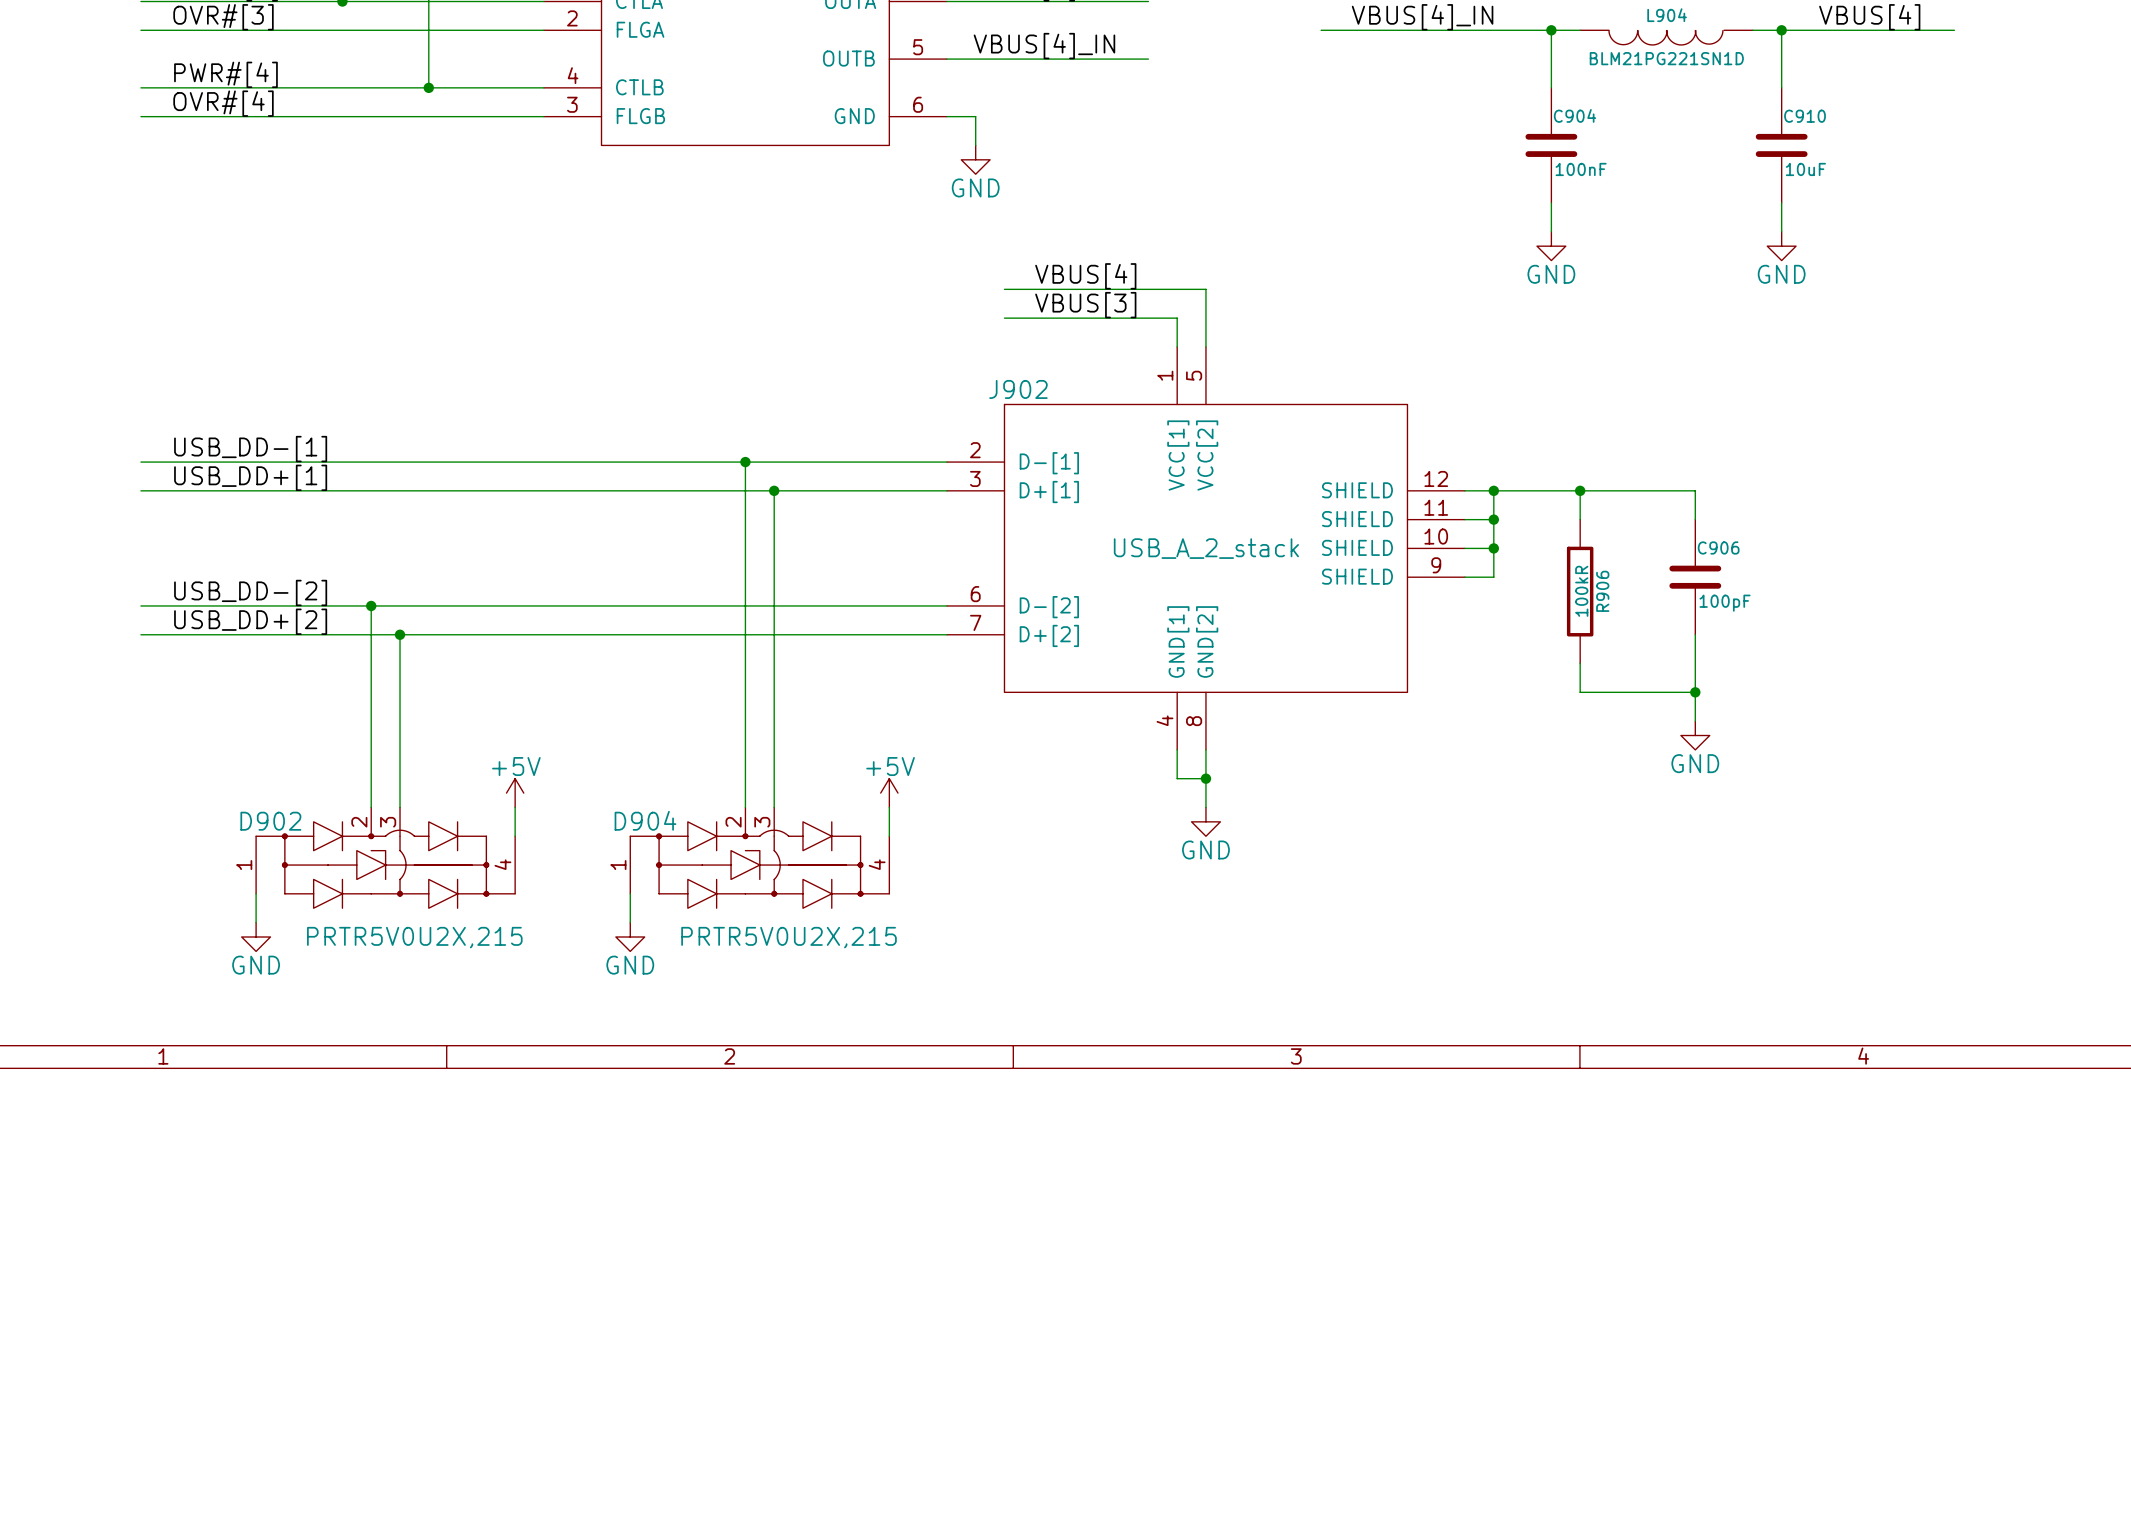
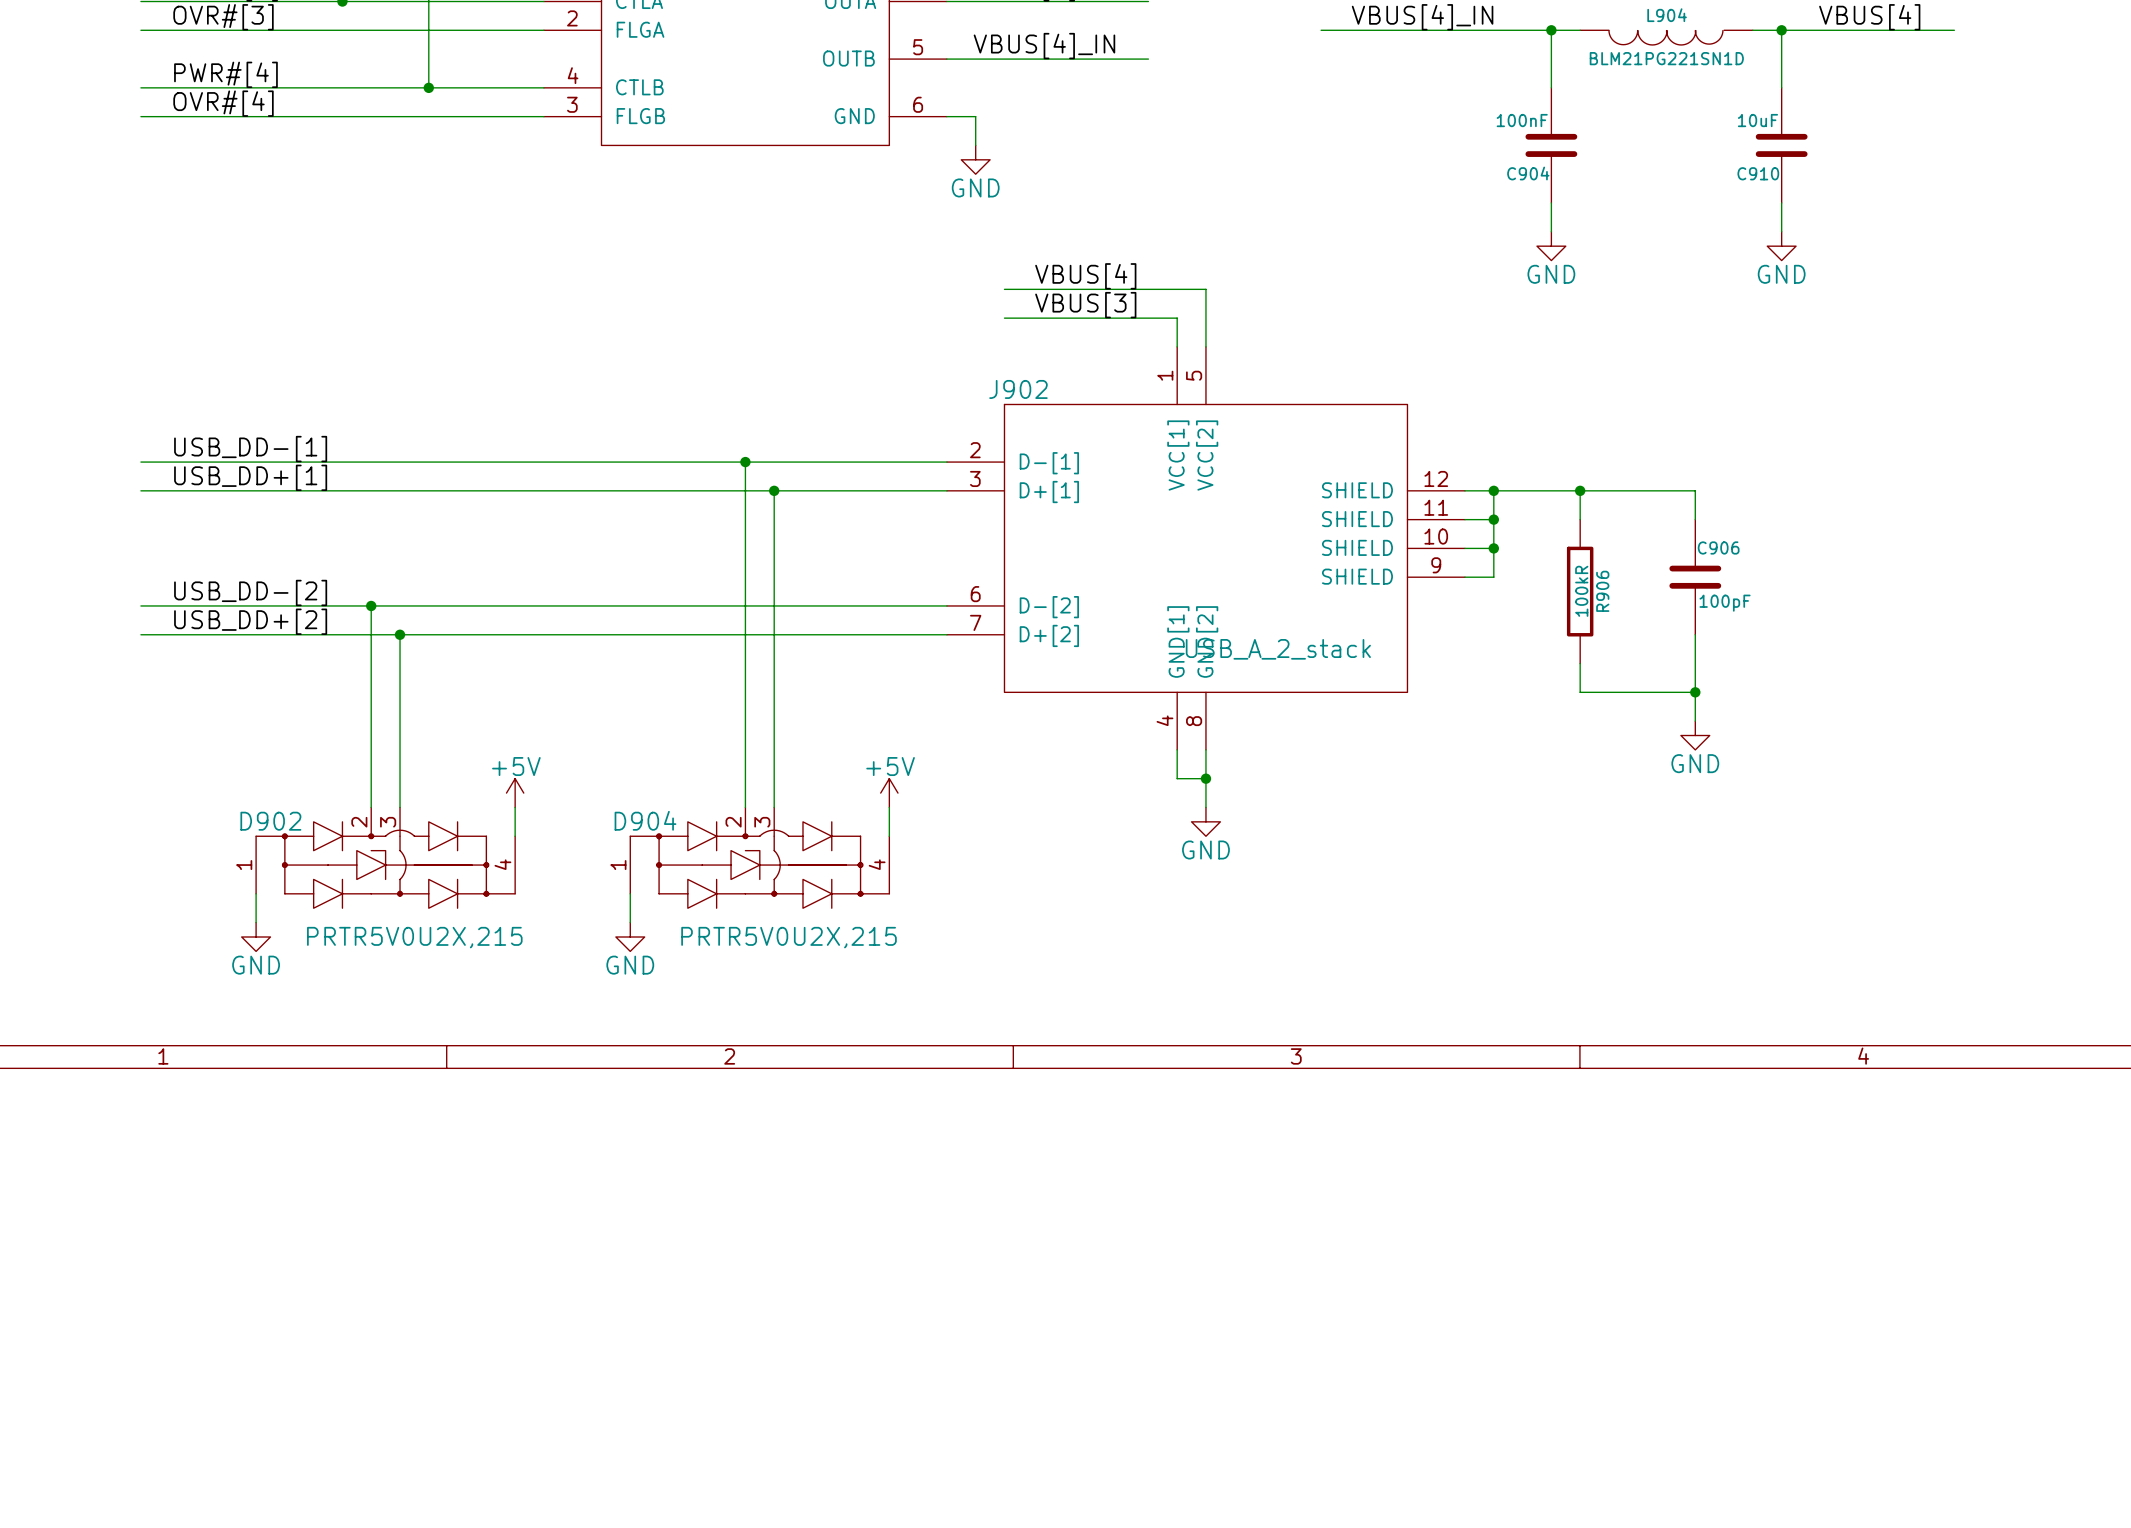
C904 name position: C904 (1575, 115) -> C904 (1528, 173)
C910 name position: C910 (1805, 116) -> C910 (1758, 173)
C904 value position: 100nF (1581, 169) -> 100nF (1522, 120)
C910 value position: 10uF (1805, 169) -> 10uF (1757, 120)
J902 value position: USB_A_2_stack (1206, 548) -> USB_A_2_stack (1278, 649)

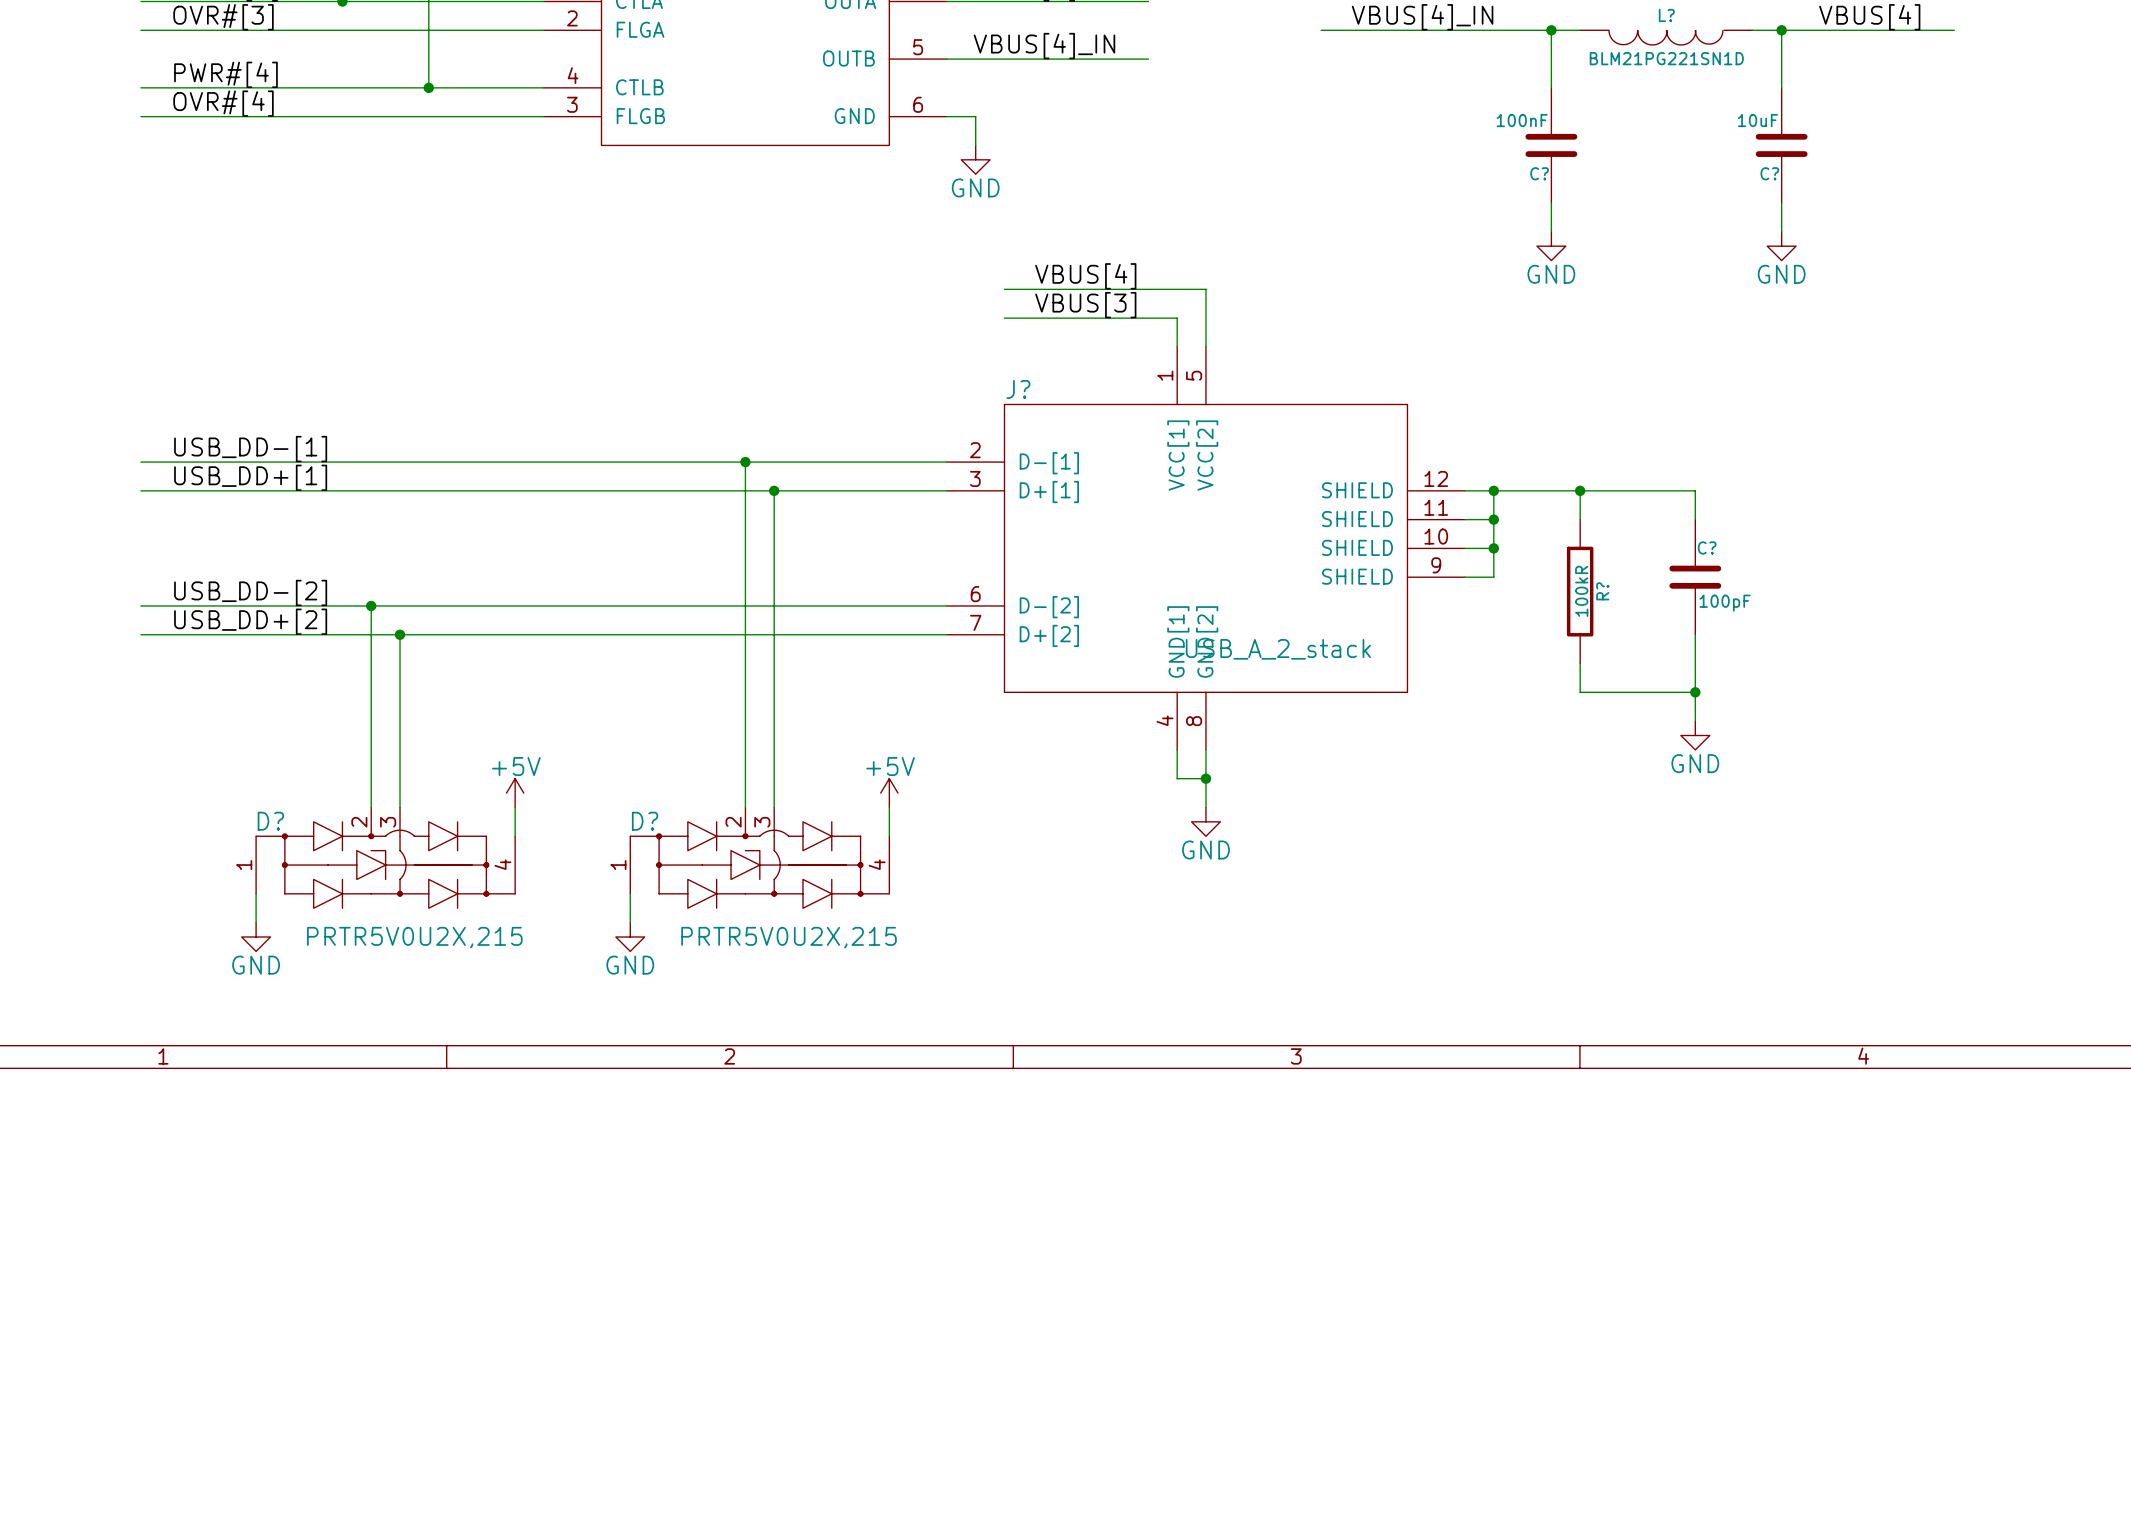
L904 name: L904 (1667, 15) -> L? (1666, 15)
C904 name: C904 (1528, 173) -> C? (1539, 173)
C910 name: C910 (1758, 173) -> C? (1769, 173)
J902 name: J902 (1018, 389) -> J? (1018, 389)
C906 name: C906 (1718, 547) -> C? (1707, 547)
R906 name: R906 (1602, 591) -> R? (1602, 591)
D904 name: D904 (645, 820) -> D? (645, 821)
D902 name: D902 (270, 821) -> D? (270, 821)

